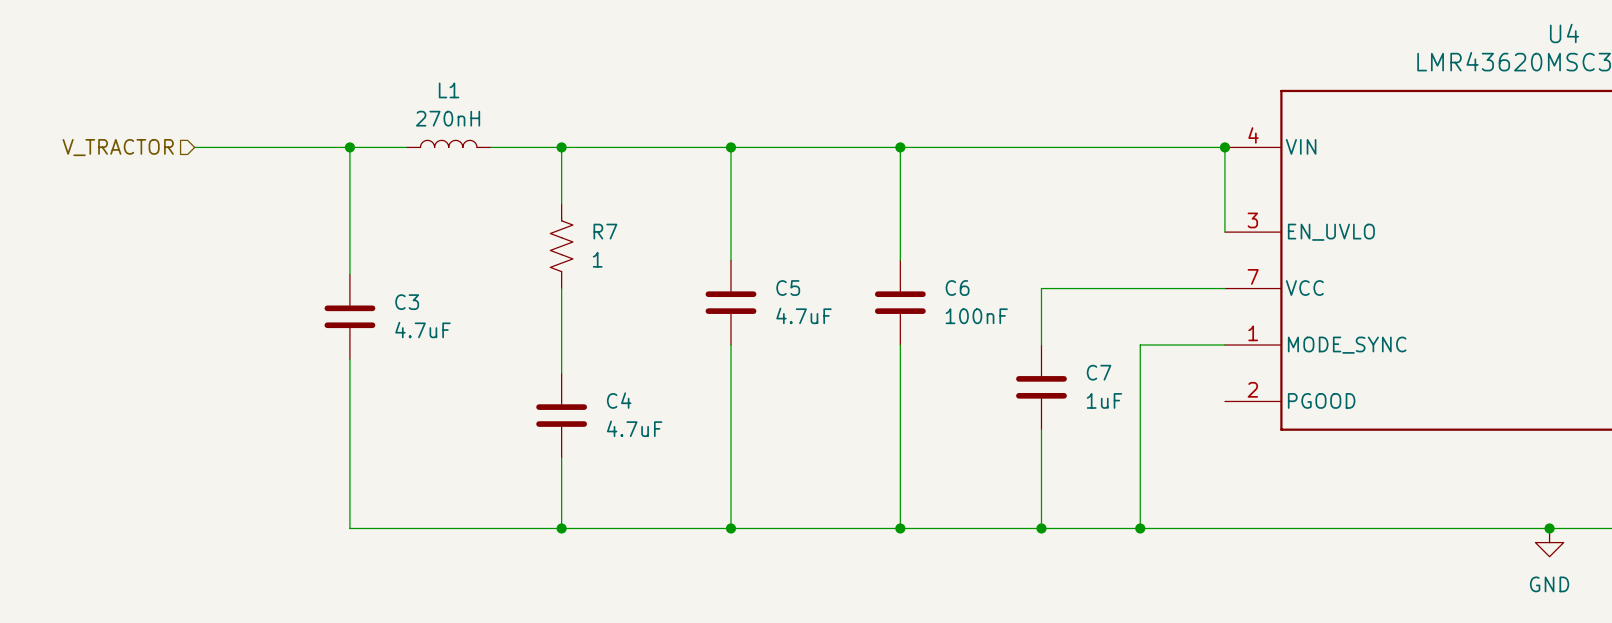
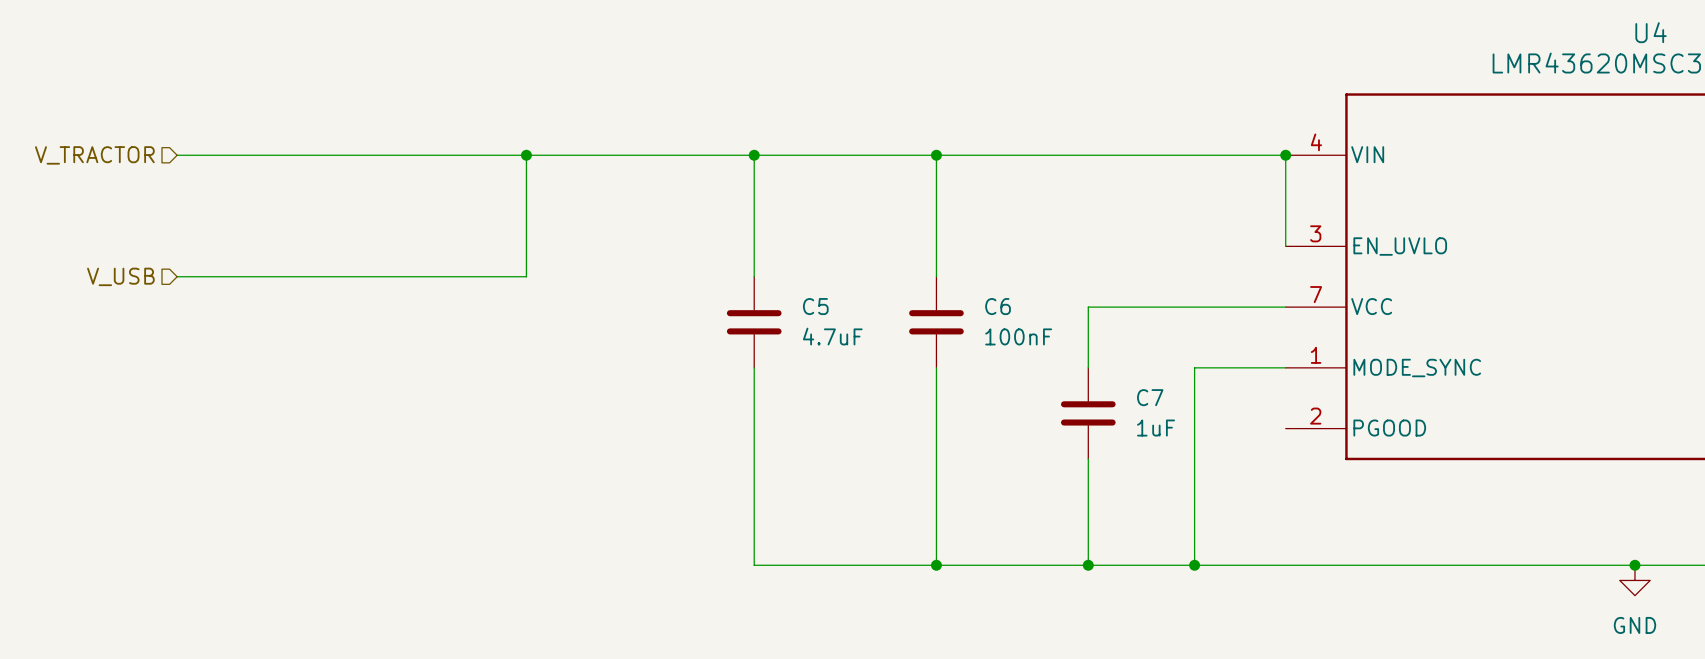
L1: 270nH (448, 143) -> none
wire: (349, 147) (349, 274) -> none
junction: (349, 147) -> none
wire: none -> (404, 155) (496, 155)
wire: none -> (526, 155) (526, 276) (177, 276)
wire: (561, 147) (561, 203) -> none
junction position: (561, 147) -> (526, 155)
R7: 1 (561, 246) -> none
hierarchical label: none -> V_USB (120, 276)
wire: (561, 288) (561, 373) -> none
C3: 4.7uF (349, 316) -> none
wire: (349, 359) (349, 528) (730, 528) -> none
C4: 4.7uF (561, 415) -> none
wire: (561, 457) (561, 528) -> none
junction: (561, 528) -> none
junction: (730, 528) -> none

